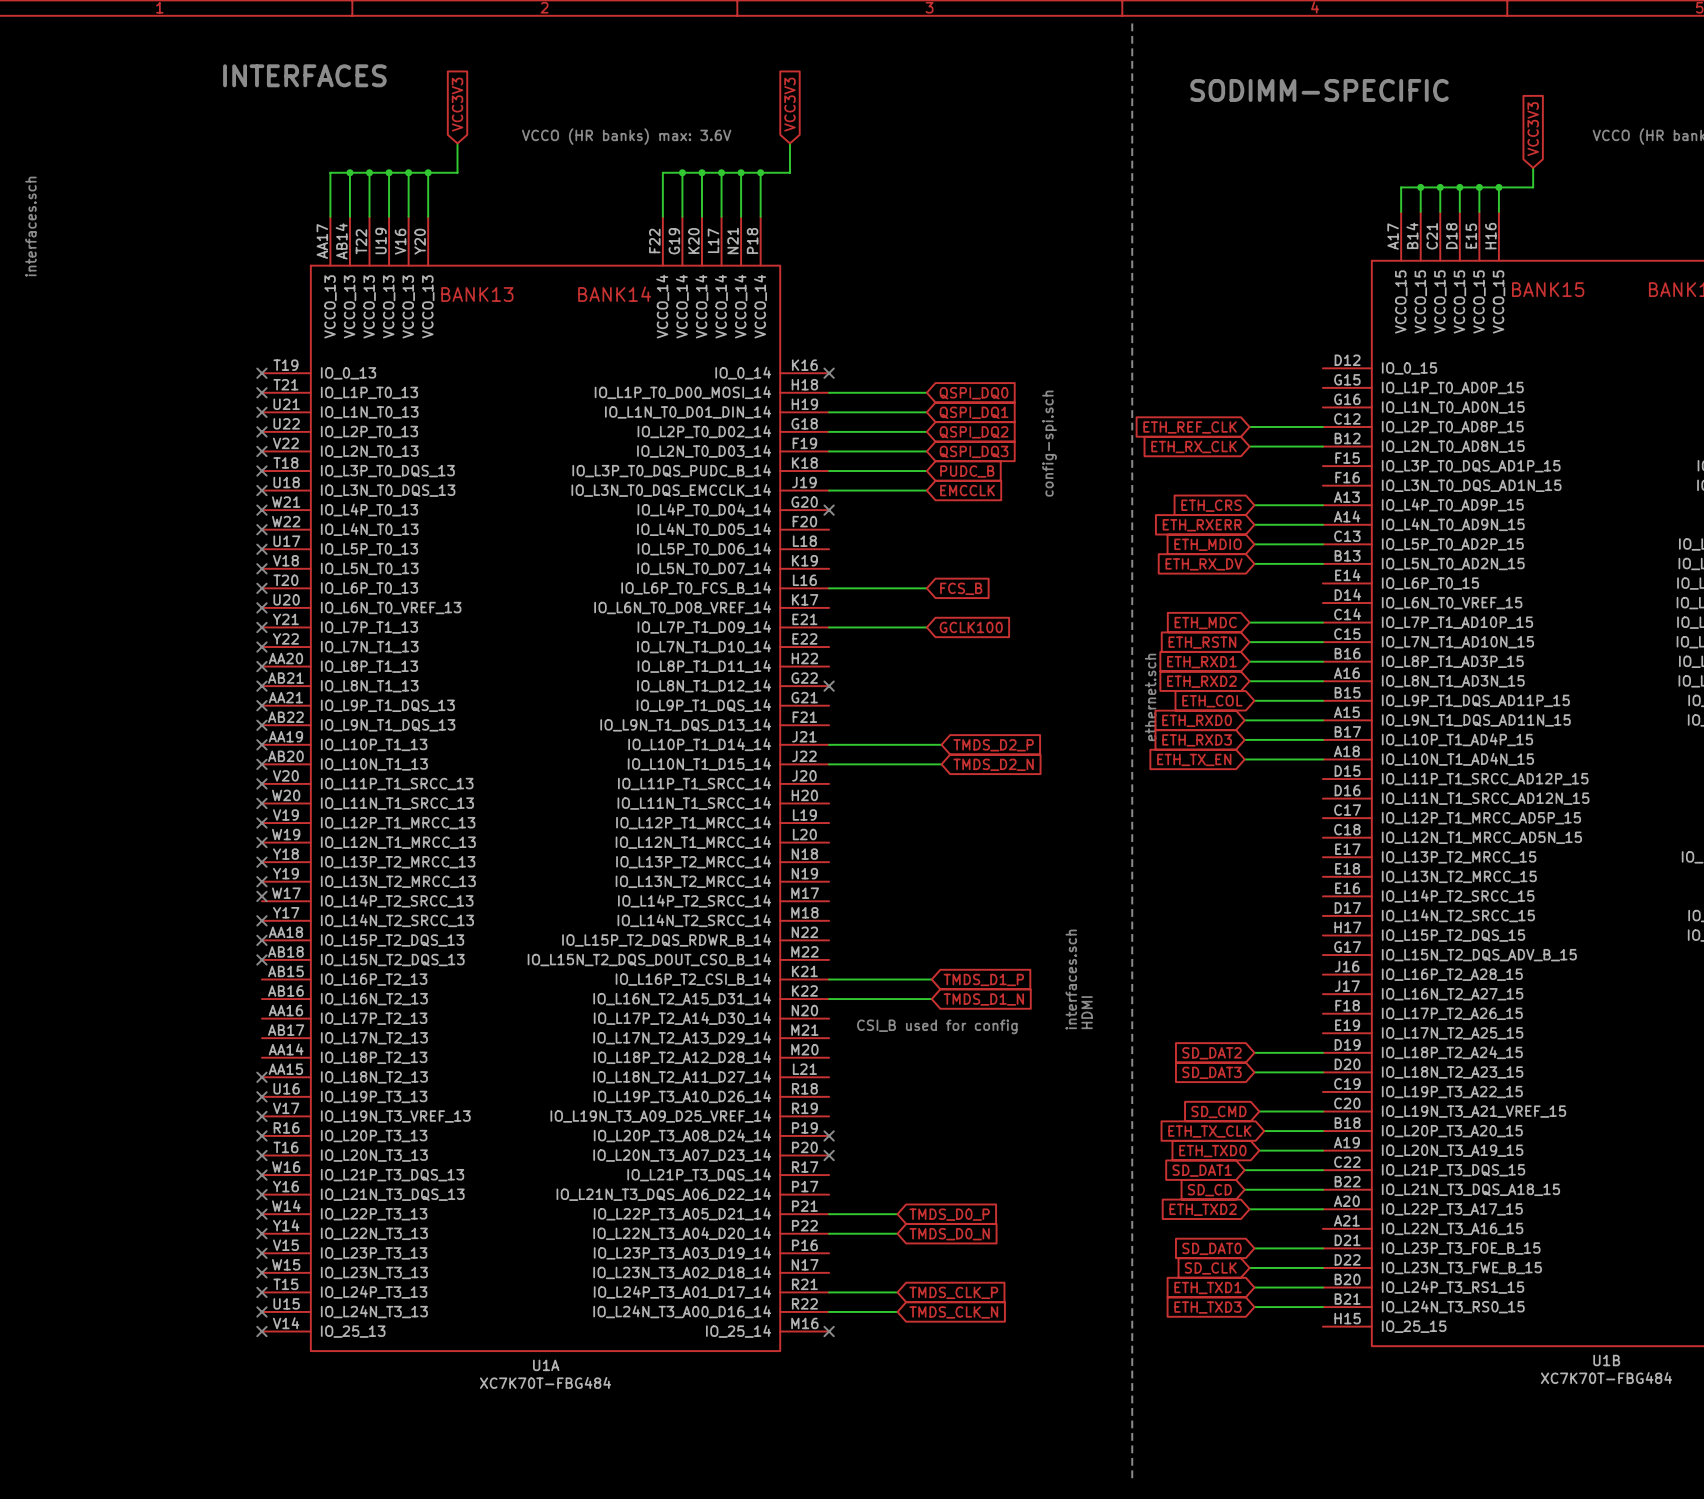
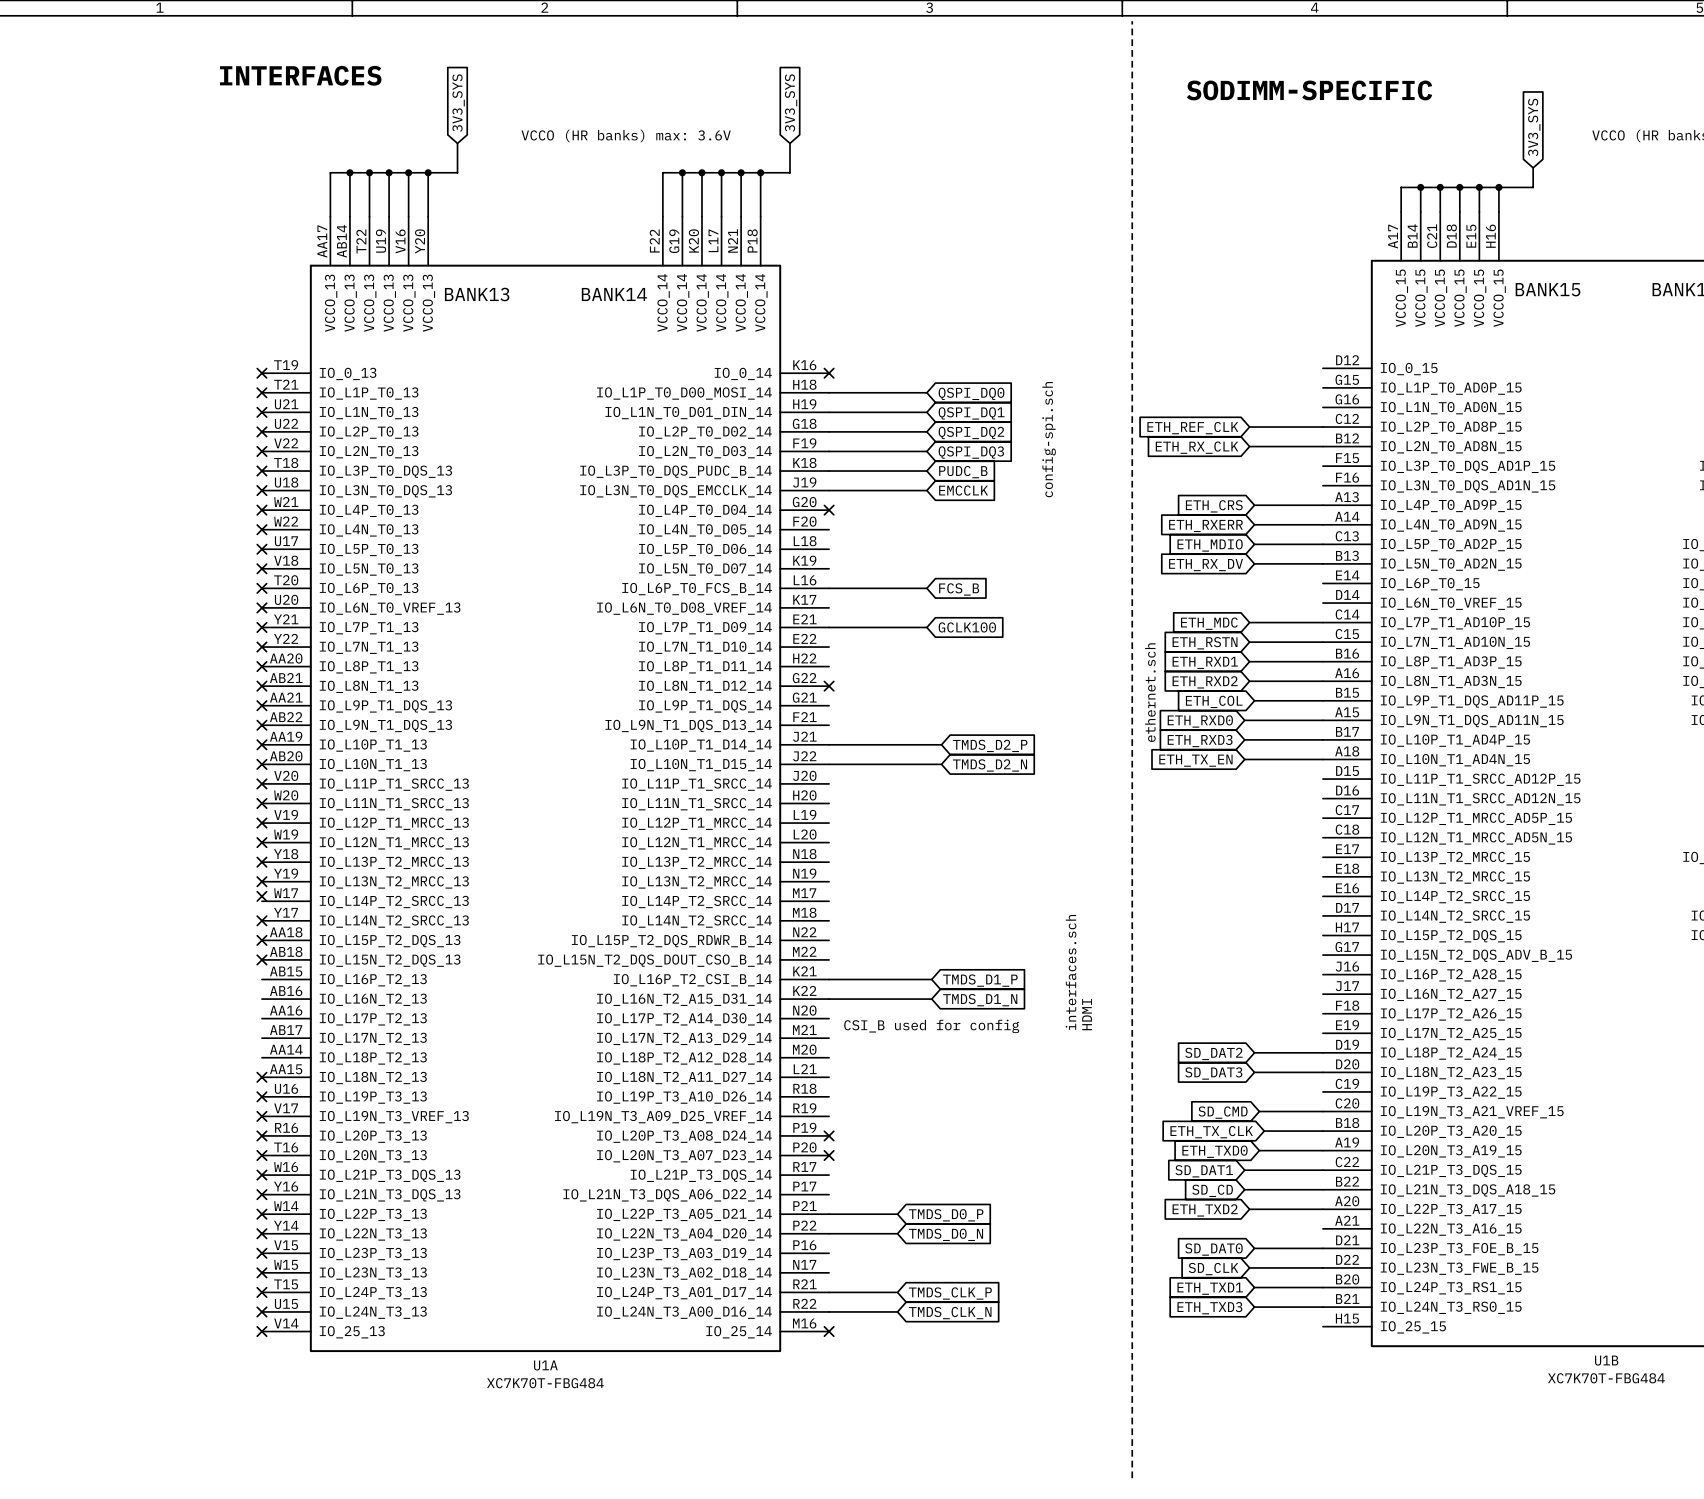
global label: VCC3V3 (457, 104) -> 3V3_SYS (458, 103)
global label: VCC3V3 (789, 104) -> 3V3_SYS (791, 103)
global label: VCC3V3 (1533, 129) -> 3V3_SYS (1534, 127)
text: interfaces.sch (30, 226) -> none

